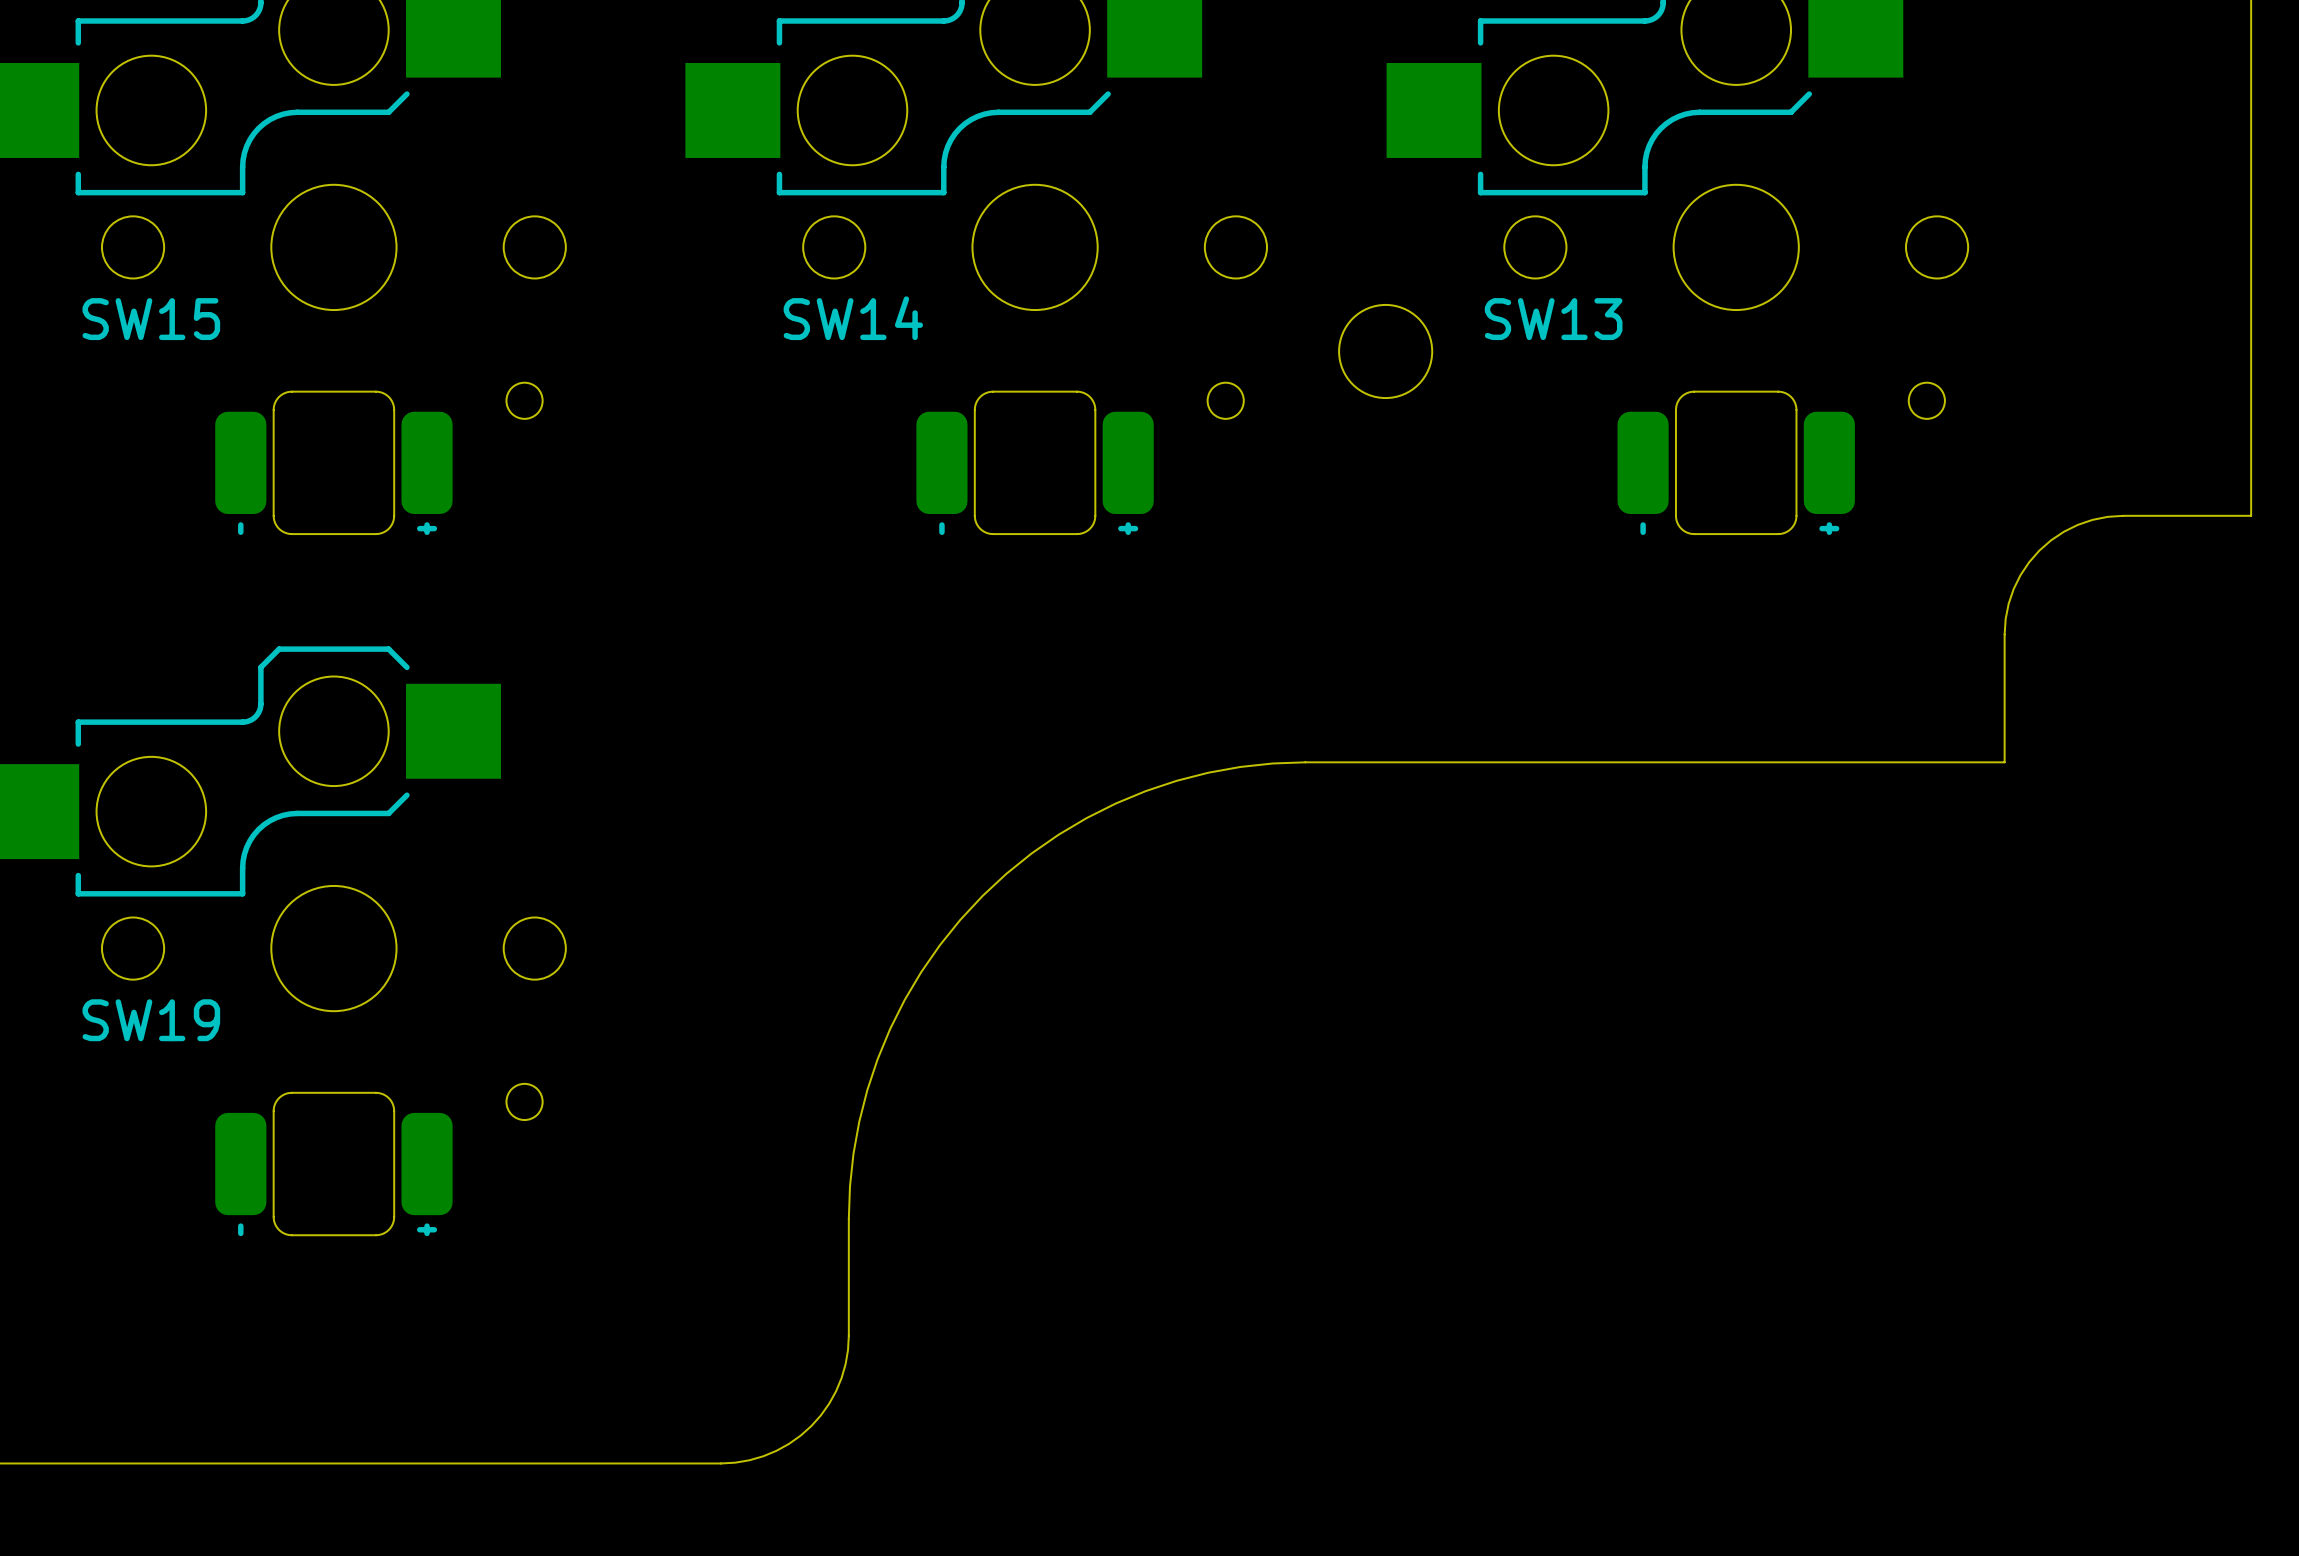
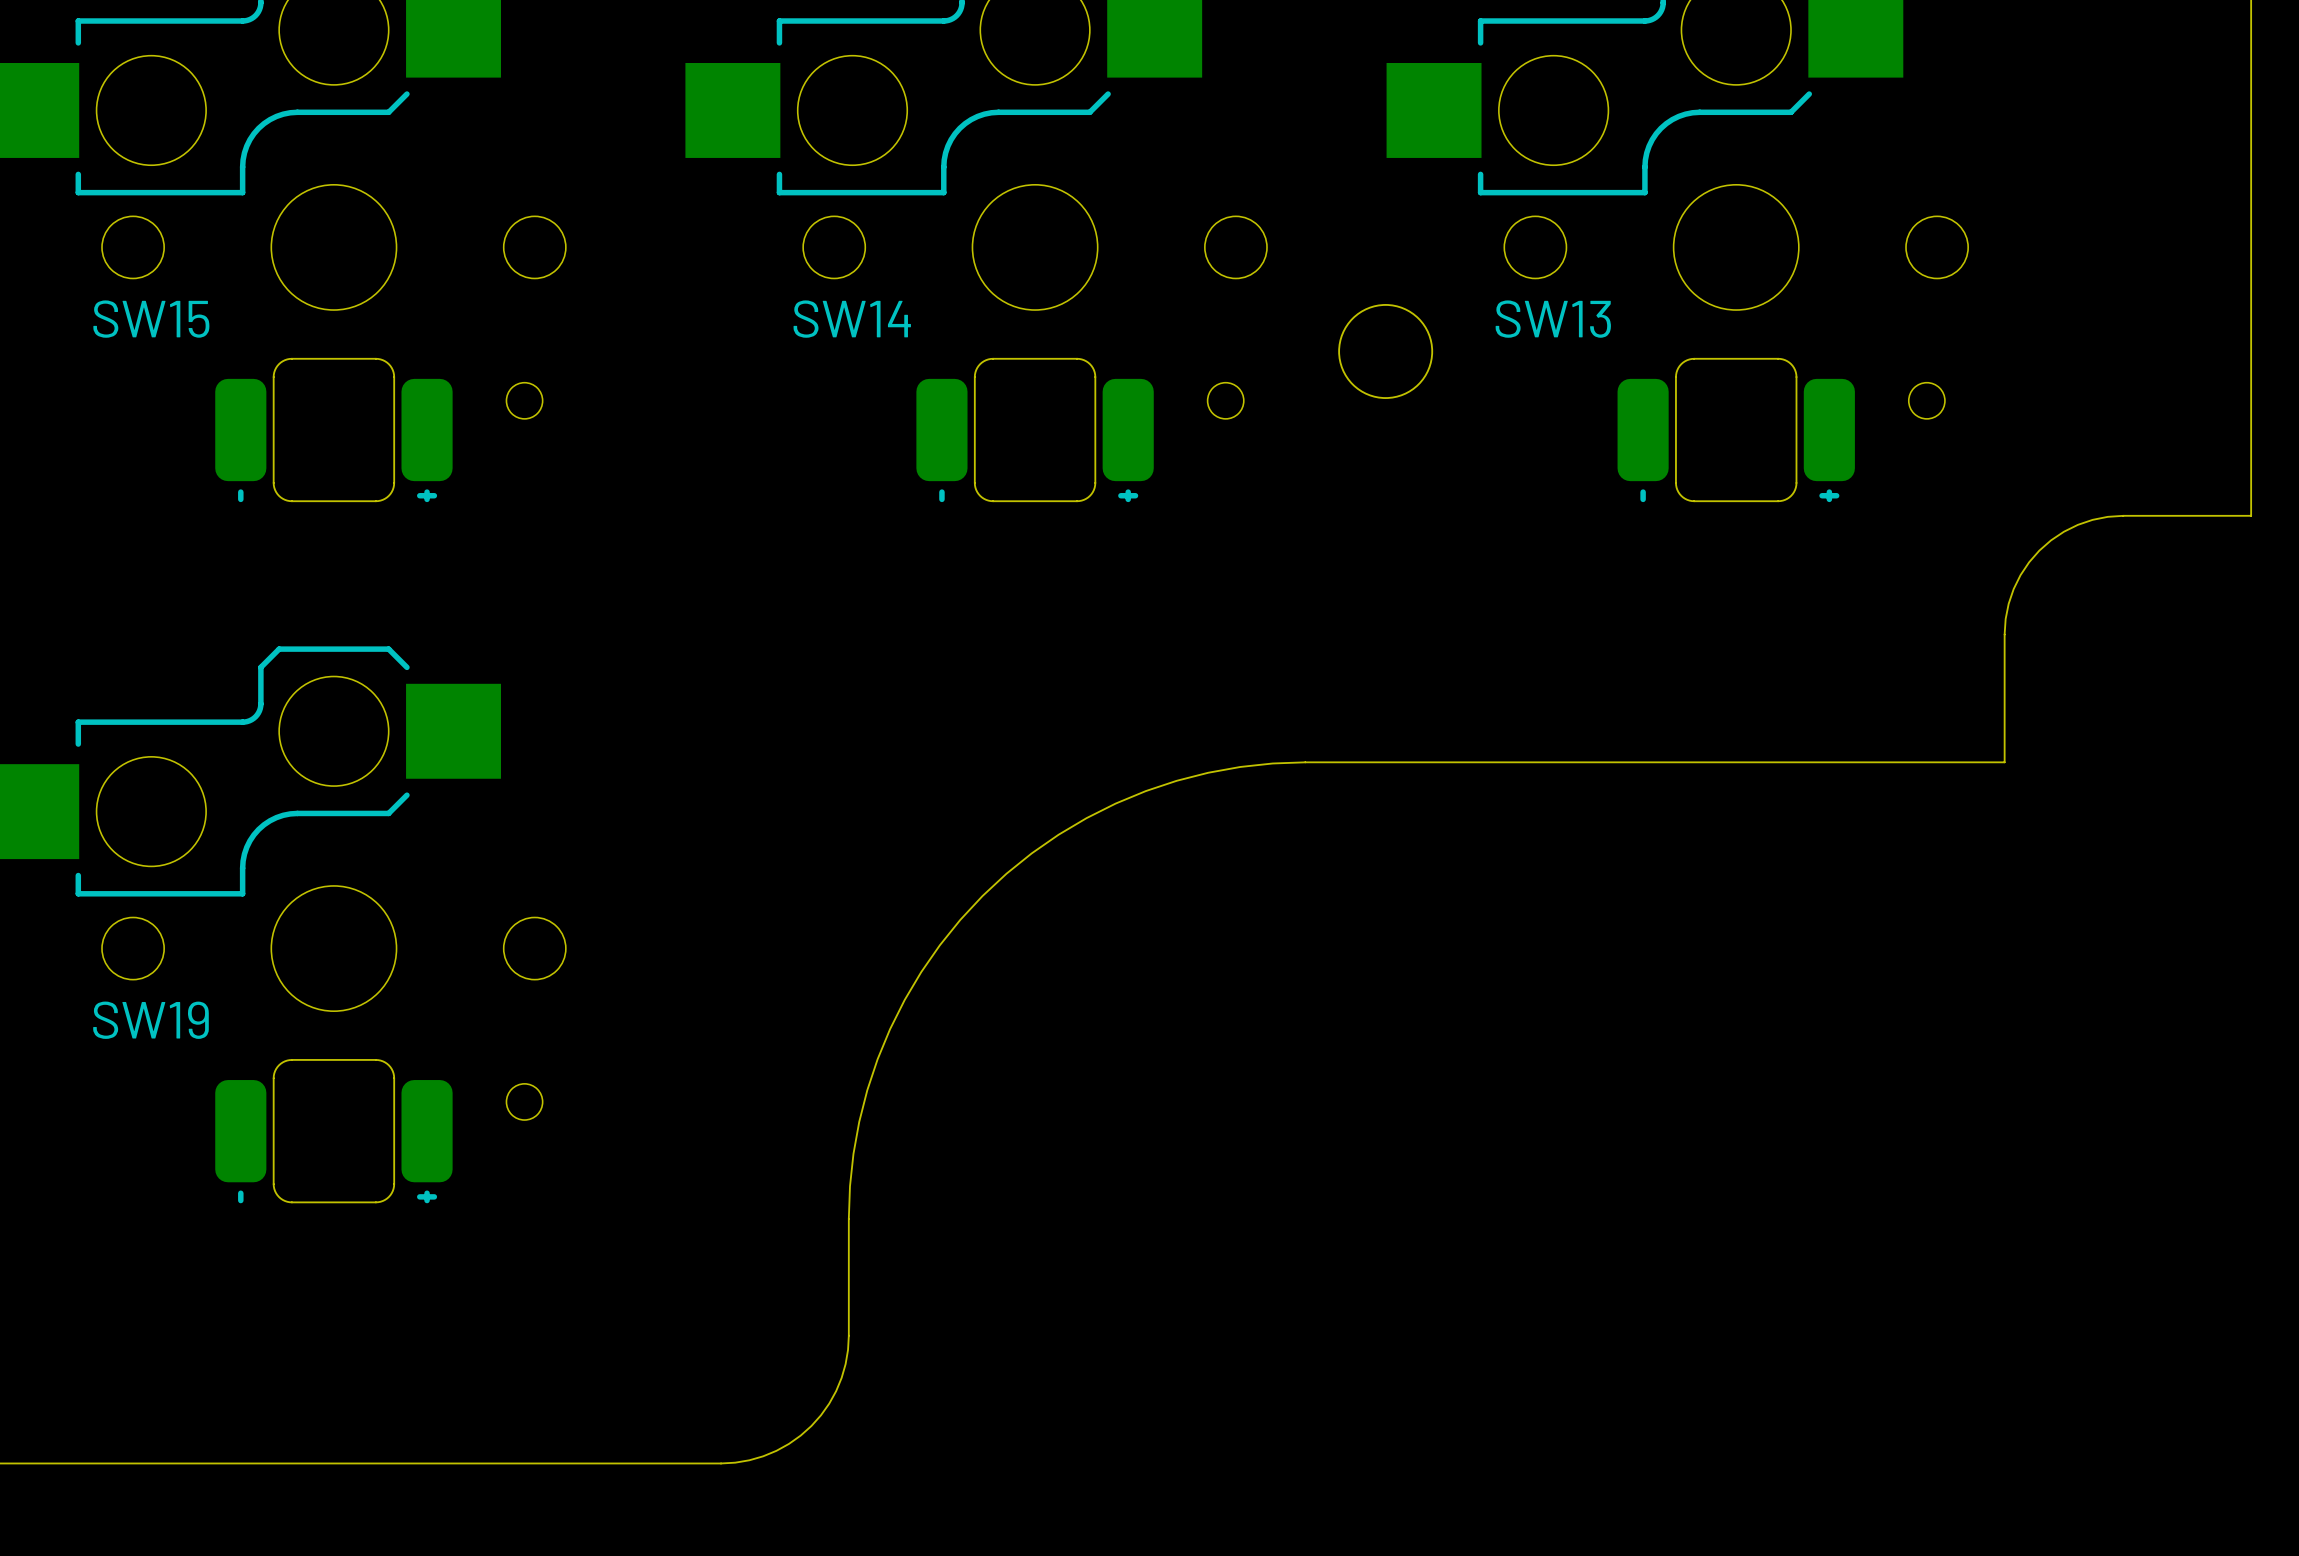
part position: (333, 462) -> (333, 430)
part position: (1035, 462) -> (1035, 430)
part position: (1736, 462) -> (1736, 430)
part position: (333, 1164) -> (333, 1131)

